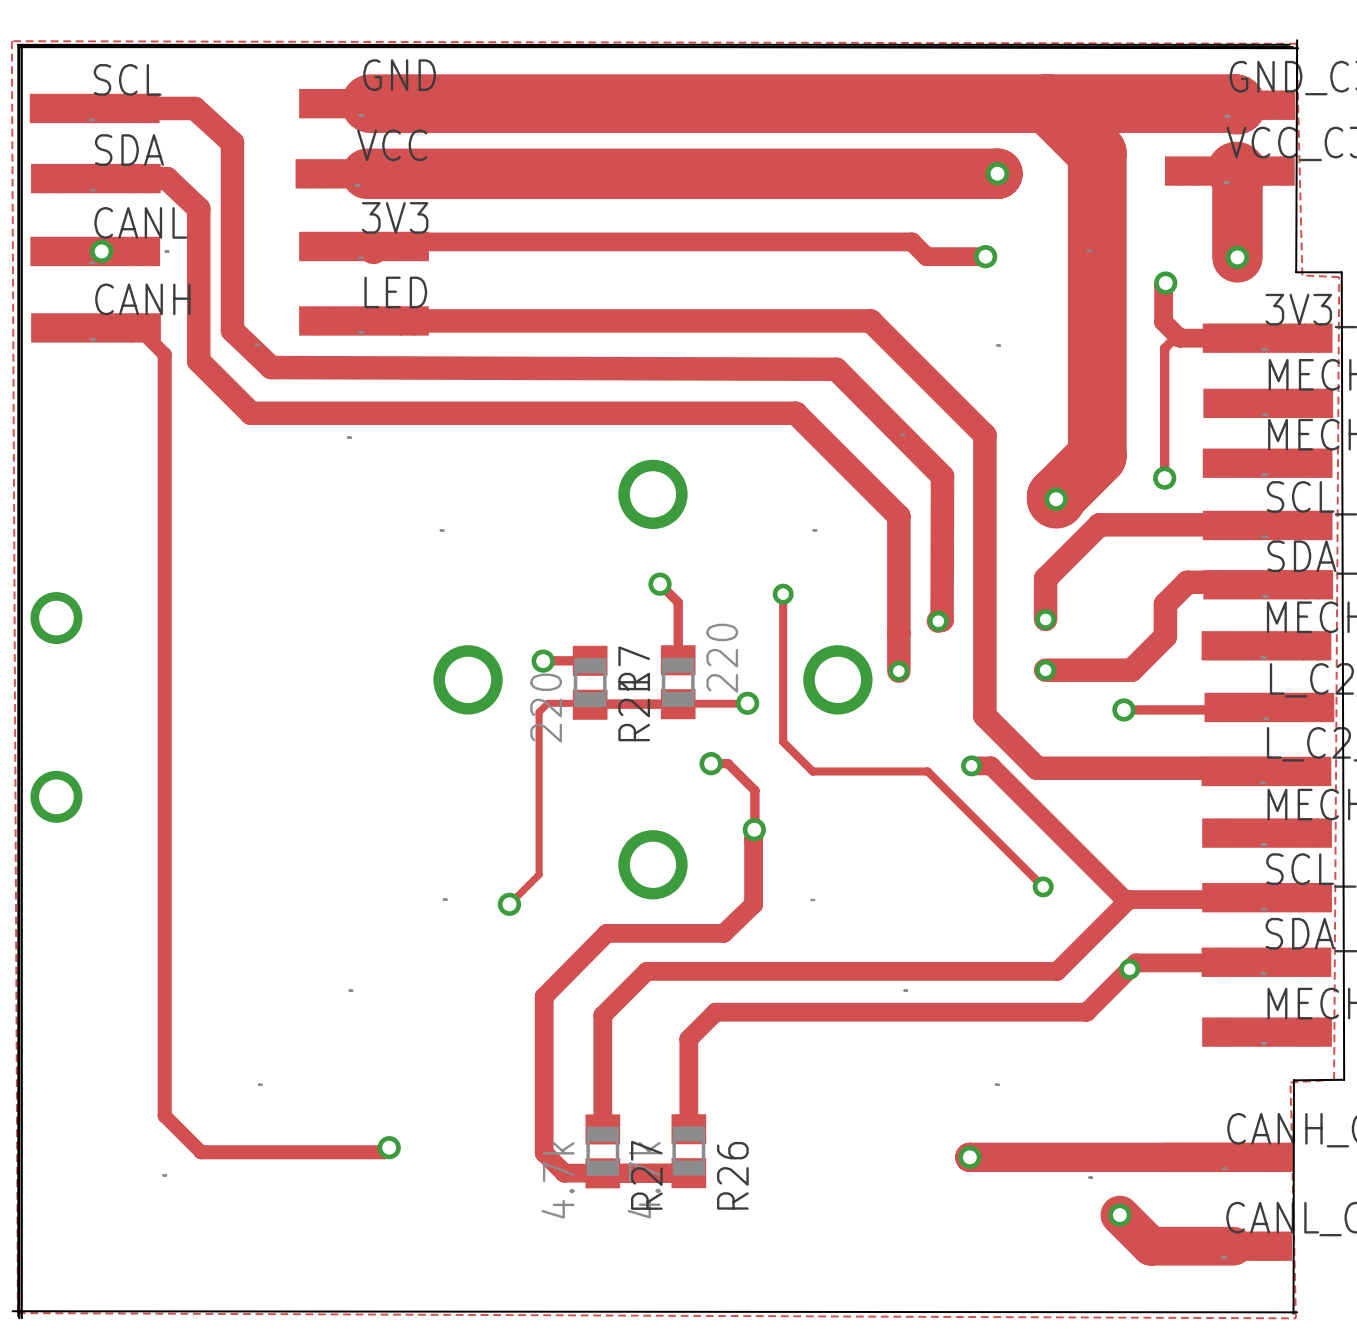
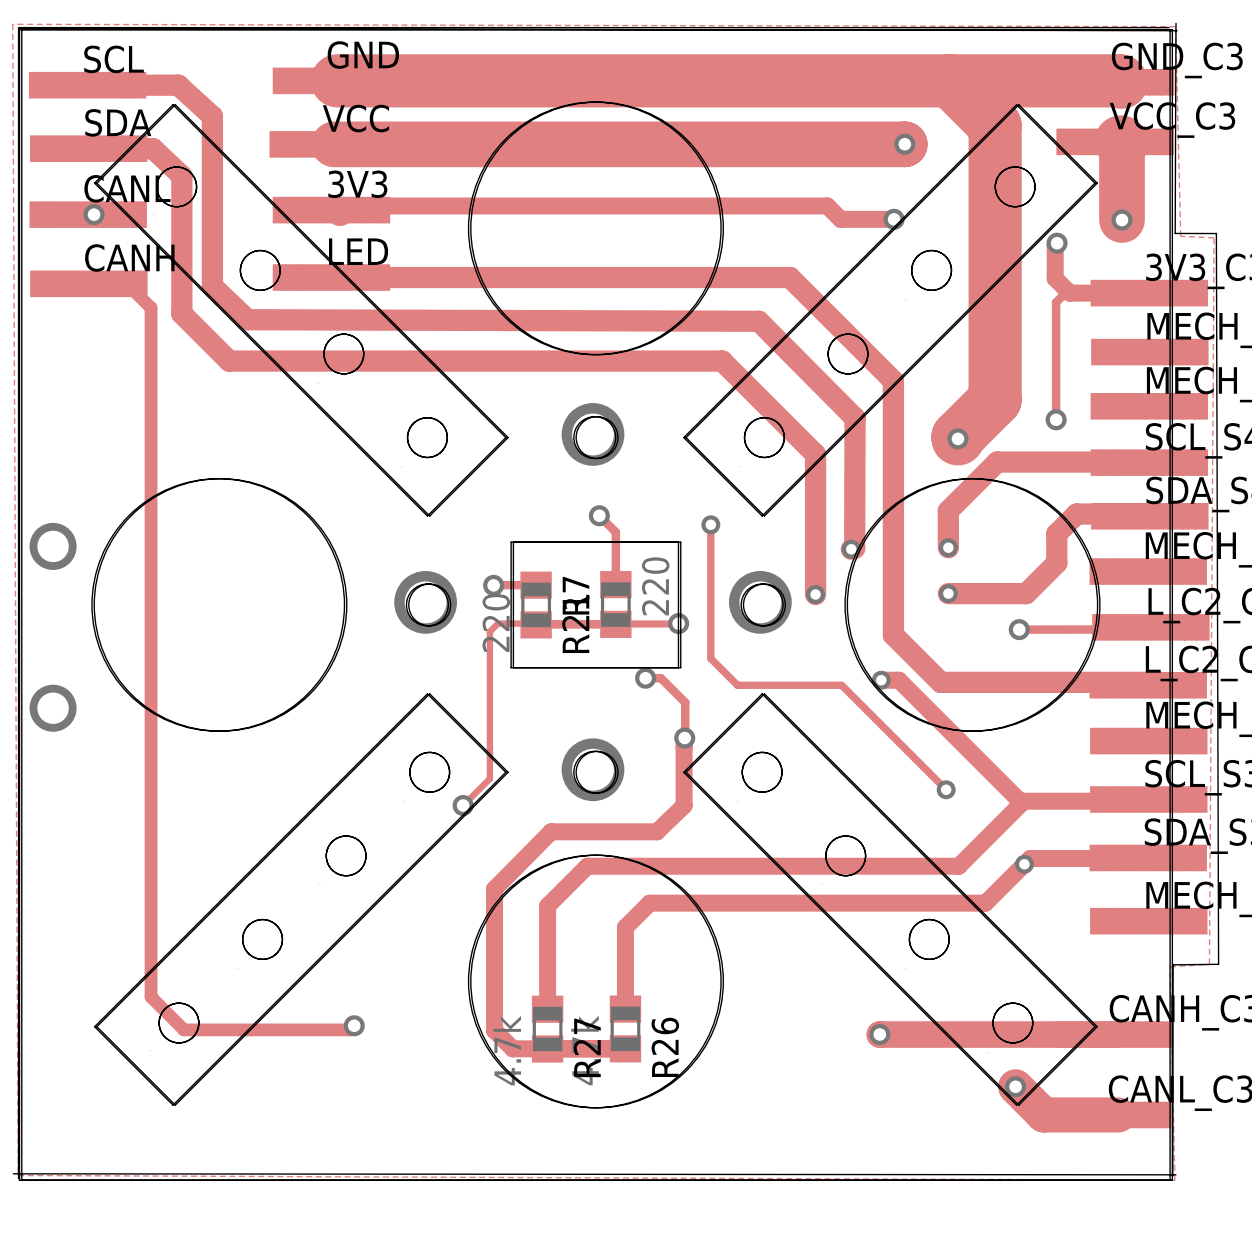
board edge: none -> (1170, 29) (1170, 1180)
board edge: none -> (1172, 29) (1172, 1180) (19, 1180)
round board edge: none -> [468, 102, 722, 355]
round board edge: none -> [470, 102, 724, 355]
board edge: none -> (173, 104) (505, 437) (427, 515) (94, 183) (173, 104)
board edge: none -> (175, 104) (508, 437) (429, 515) (96, 183) (175, 104)
board edge: none -> (1016, 104) (683, 437) (762, 515) (1094, 183) (1016, 104)
board edge: none -> (1018, 104) (686, 437) (764, 515) (1097, 183) (1018, 104)
round board edge: none -> [156, 166, 197, 207]
round board edge: none -> [995, 166, 1036, 207]
round board edge: none -> [240, 250, 281, 291]
round board edge: none -> [911, 250, 952, 291]
round board edge: none -> [323, 334, 364, 374]
round board edge: none -> [828, 334, 868, 374]
round board edge: none -> [573, 416, 616, 459]
round board edge: none -> [576, 416, 619, 459]
round board edge: none -> [407, 417, 448, 458]
round board edge: none -> [744, 417, 785, 458]
round board edge: none -> [91, 478, 345, 732]
round board edge: none -> [94, 478, 347, 732]
round board edge: none -> [845, 478, 1098, 732]
round board edge: none -> [847, 478, 1100, 732]
board edge: none -> (511, 542) (680, 542) (680, 667) (511, 667) (511, 542)
board edge: none -> (513, 542) (513, 667)
board edge: none -> (678, 542) (678, 667)
round board edge: none -> [406, 584, 449, 626]
round board edge: none -> [408, 584, 451, 626]
round board edge: none -> [741, 584, 784, 626]
round board edge: none -> [743, 584, 786, 626]
board edge: none -> (427, 693) (94, 1026) (173, 1105) (505, 772) (427, 693)
board edge: none -> (429, 693) (508, 772) (175, 1105) (96, 1026) (429, 693)
board edge: none -> (762, 693) (683, 772) (1016, 1105) (1094, 1026) (762, 693)
board edge: none -> (764, 693) (1097, 1026) (1018, 1105) (686, 772) (764, 693)
round board edge: none -> [573, 751, 616, 794]
round board edge: none -> [576, 751, 619, 794]
round board edge: none -> [409, 752, 450, 793]
round board edge: none -> [742, 752, 783, 793]
round board edge: none -> [326, 835, 367, 876]
round board edge: none -> [825, 835, 866, 876]
round board edge: none -> [468, 855, 722, 1108]
round board edge: none -> [470, 855, 724, 1108]
round board edge: none -> [242, 919, 283, 960]
round board edge: none -> [909, 919, 950, 960]
round board edge: none -> [159, 1003, 199, 1043]
round board edge: none -> [992, 1003, 1033, 1043]

